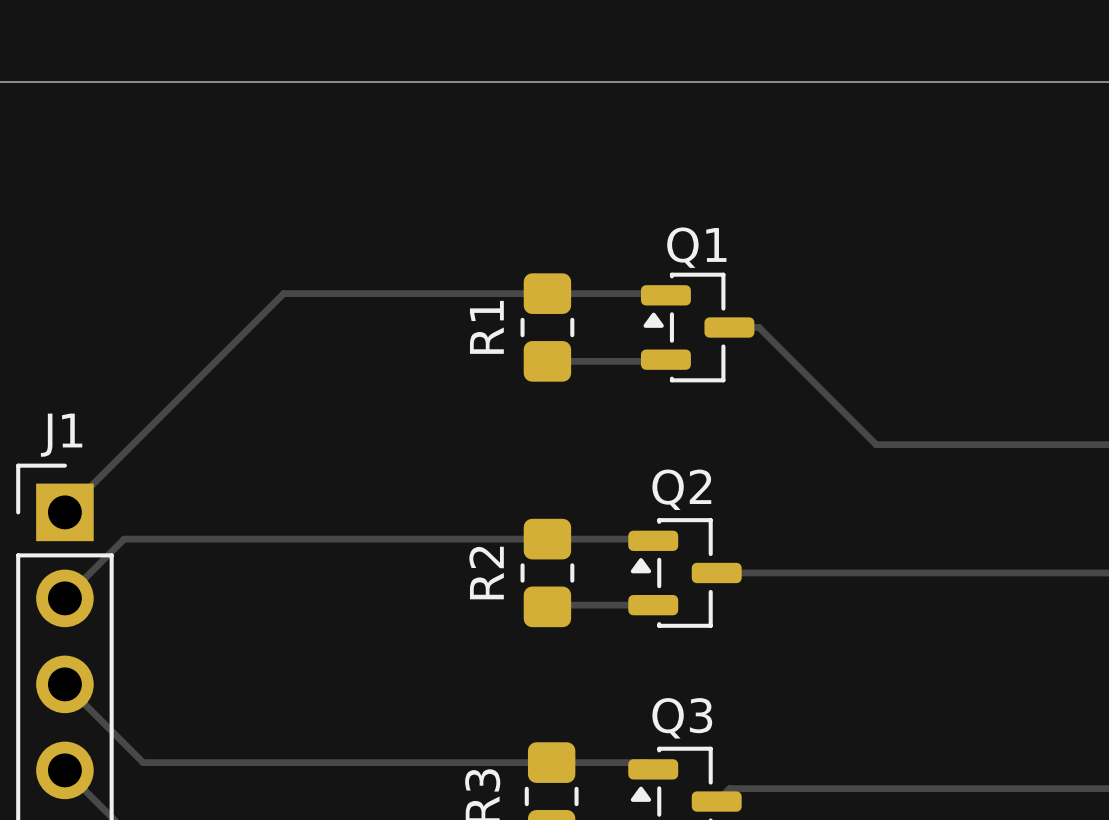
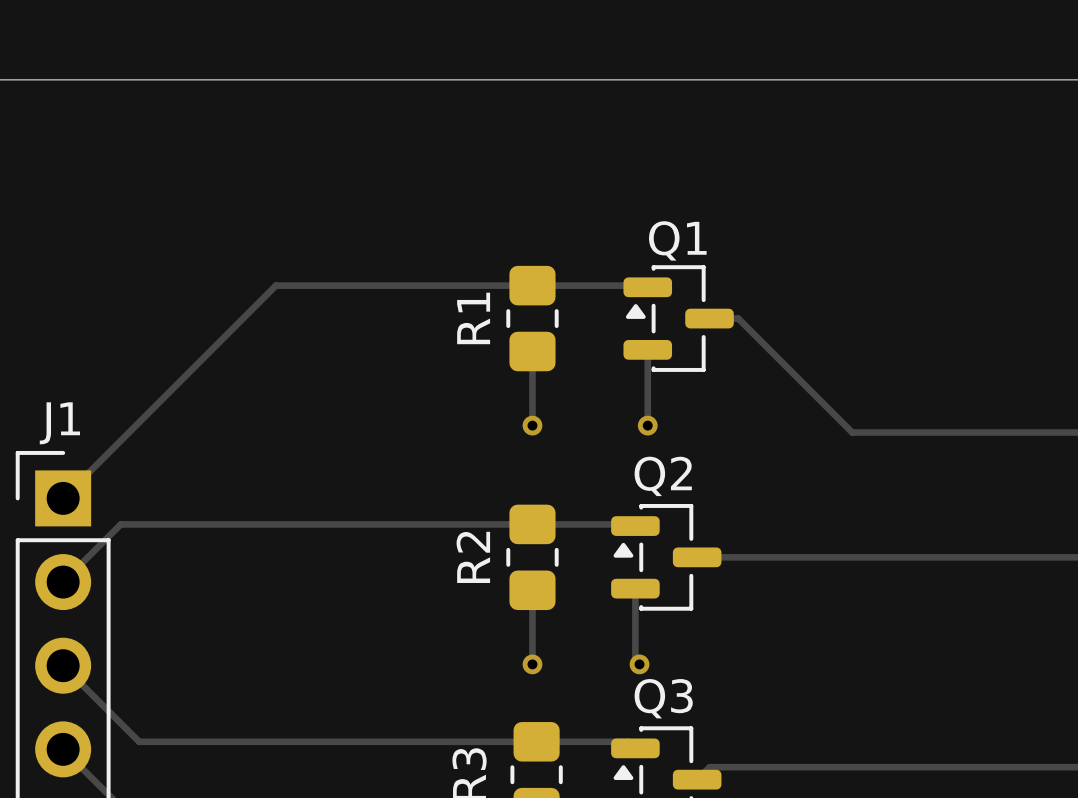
track: none -> (647, 349) (647, 425)
track: (547, 361) (664, 361) -> (532, 351) (532, 425)
via: none -> (532, 425)
via: none -> (647, 425)
track: none -> (534, 588) (532, 590) (532, 664)
track: (557, 605) (653, 605) -> none
track: none -> (633, 590) (635, 588) (635, 660) (639, 664)
via: none -> (532, 664)
via: none -> (639, 664)

